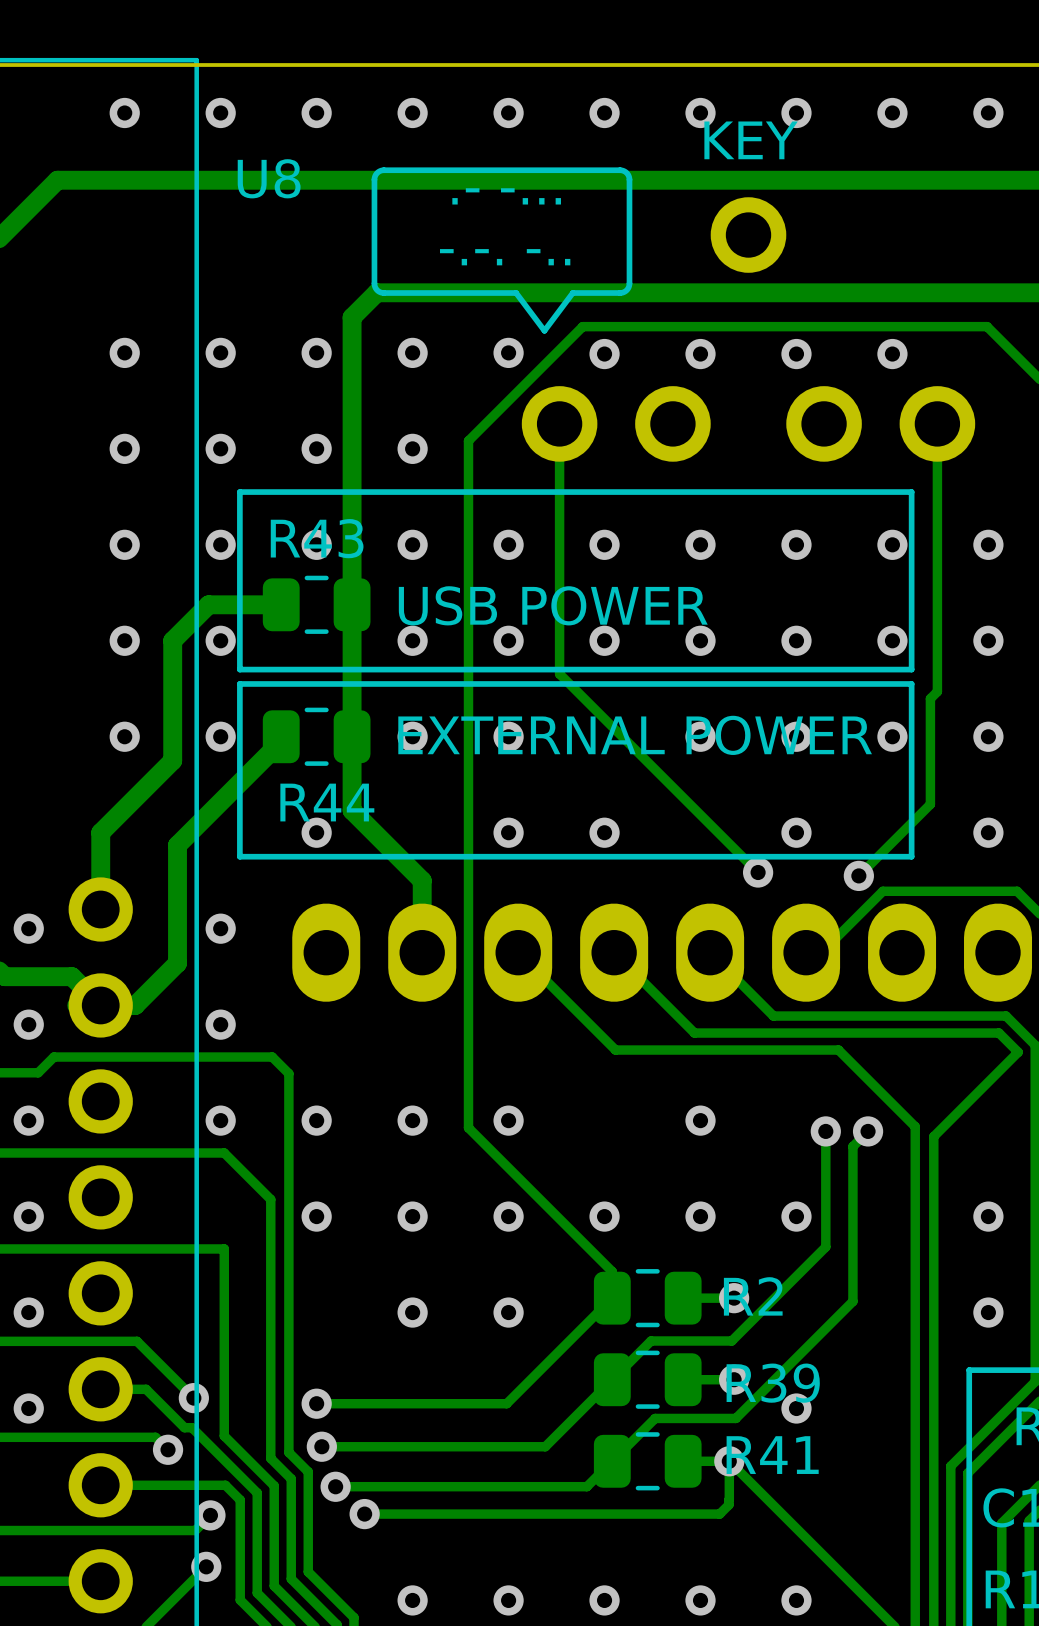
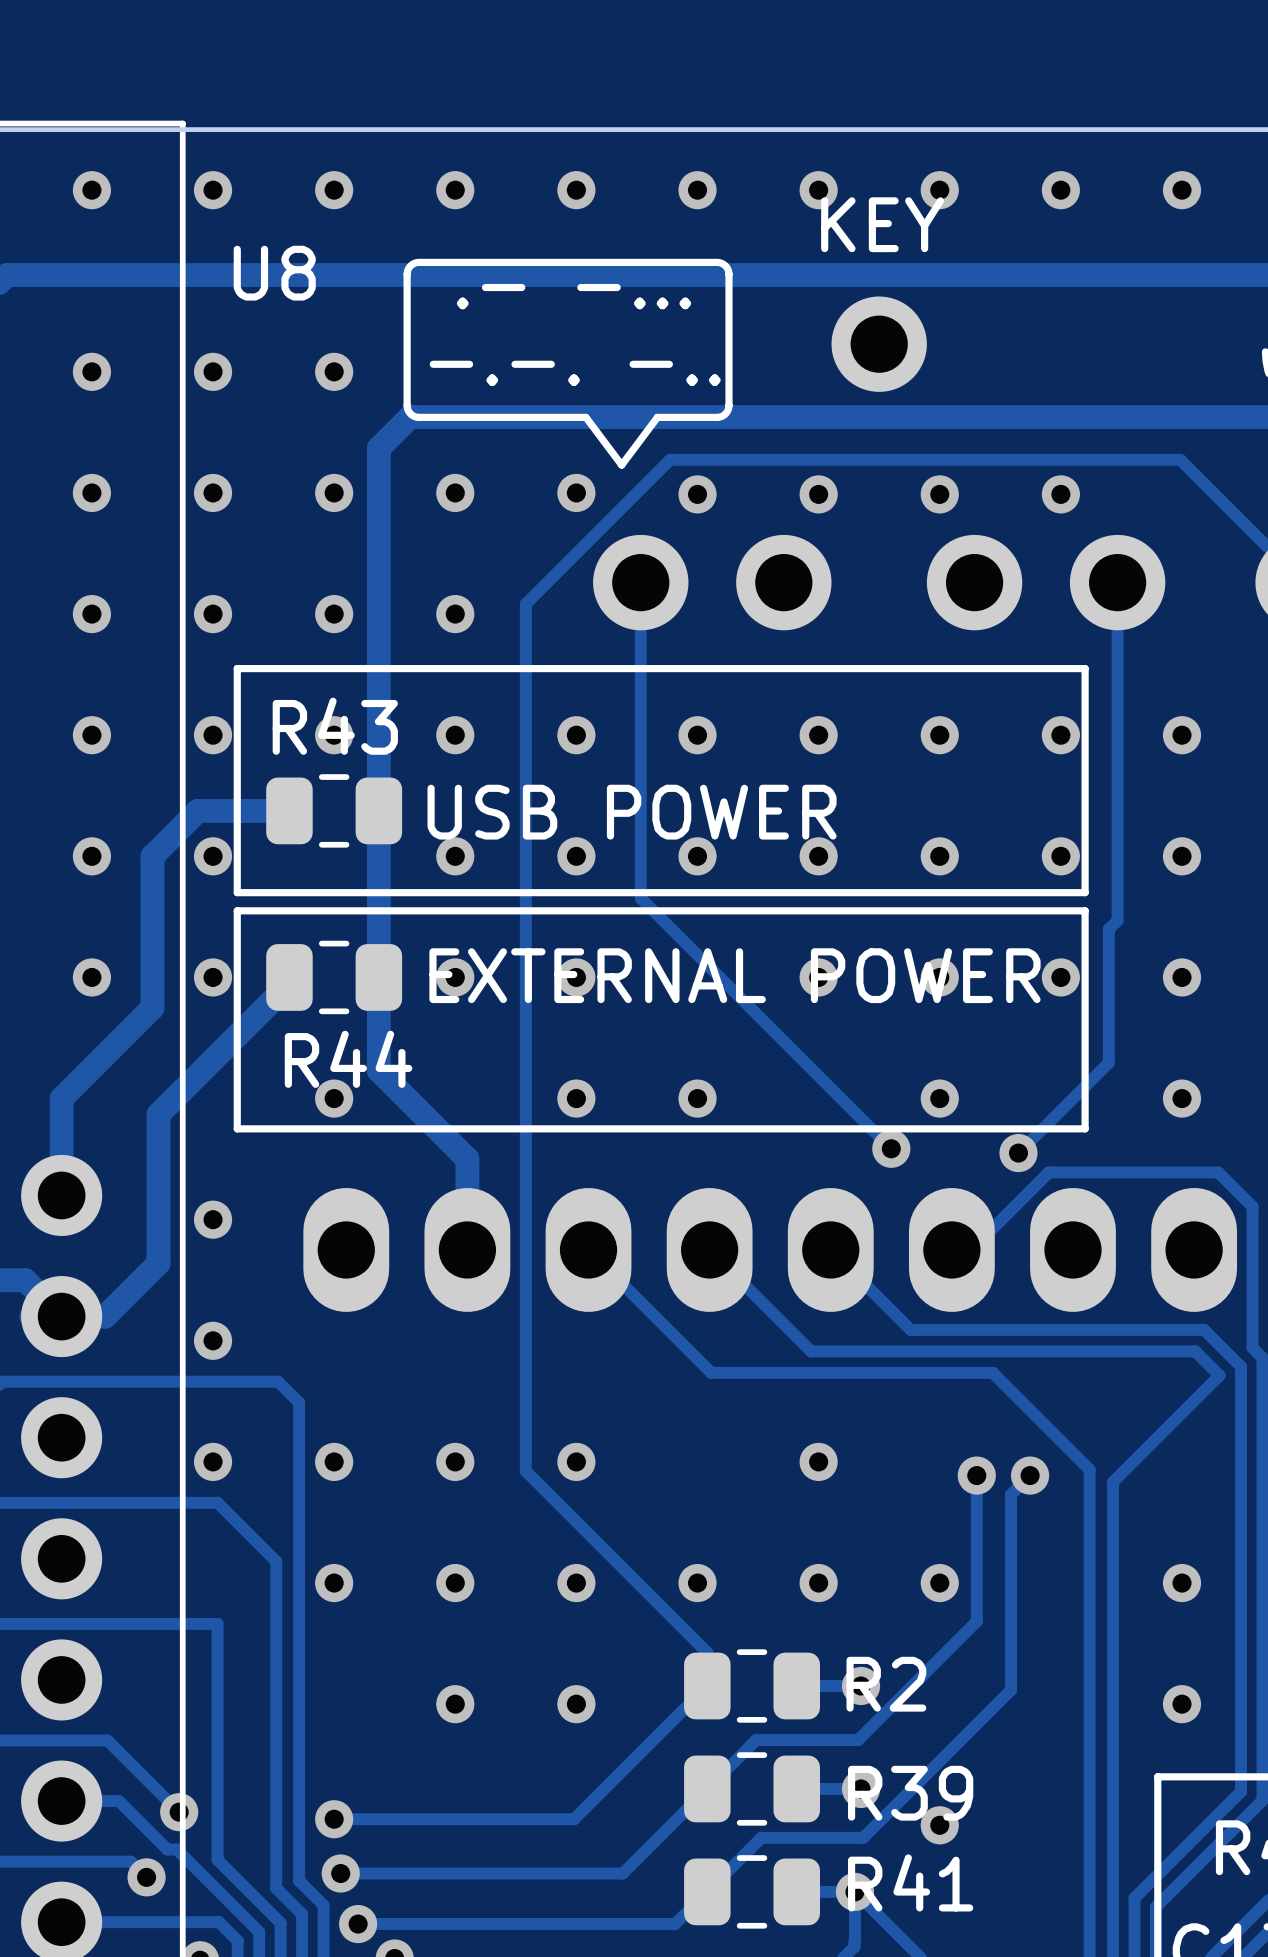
via: none -> (91, 371)
via: none -> (213, 371)
via: none -> (334, 371)

